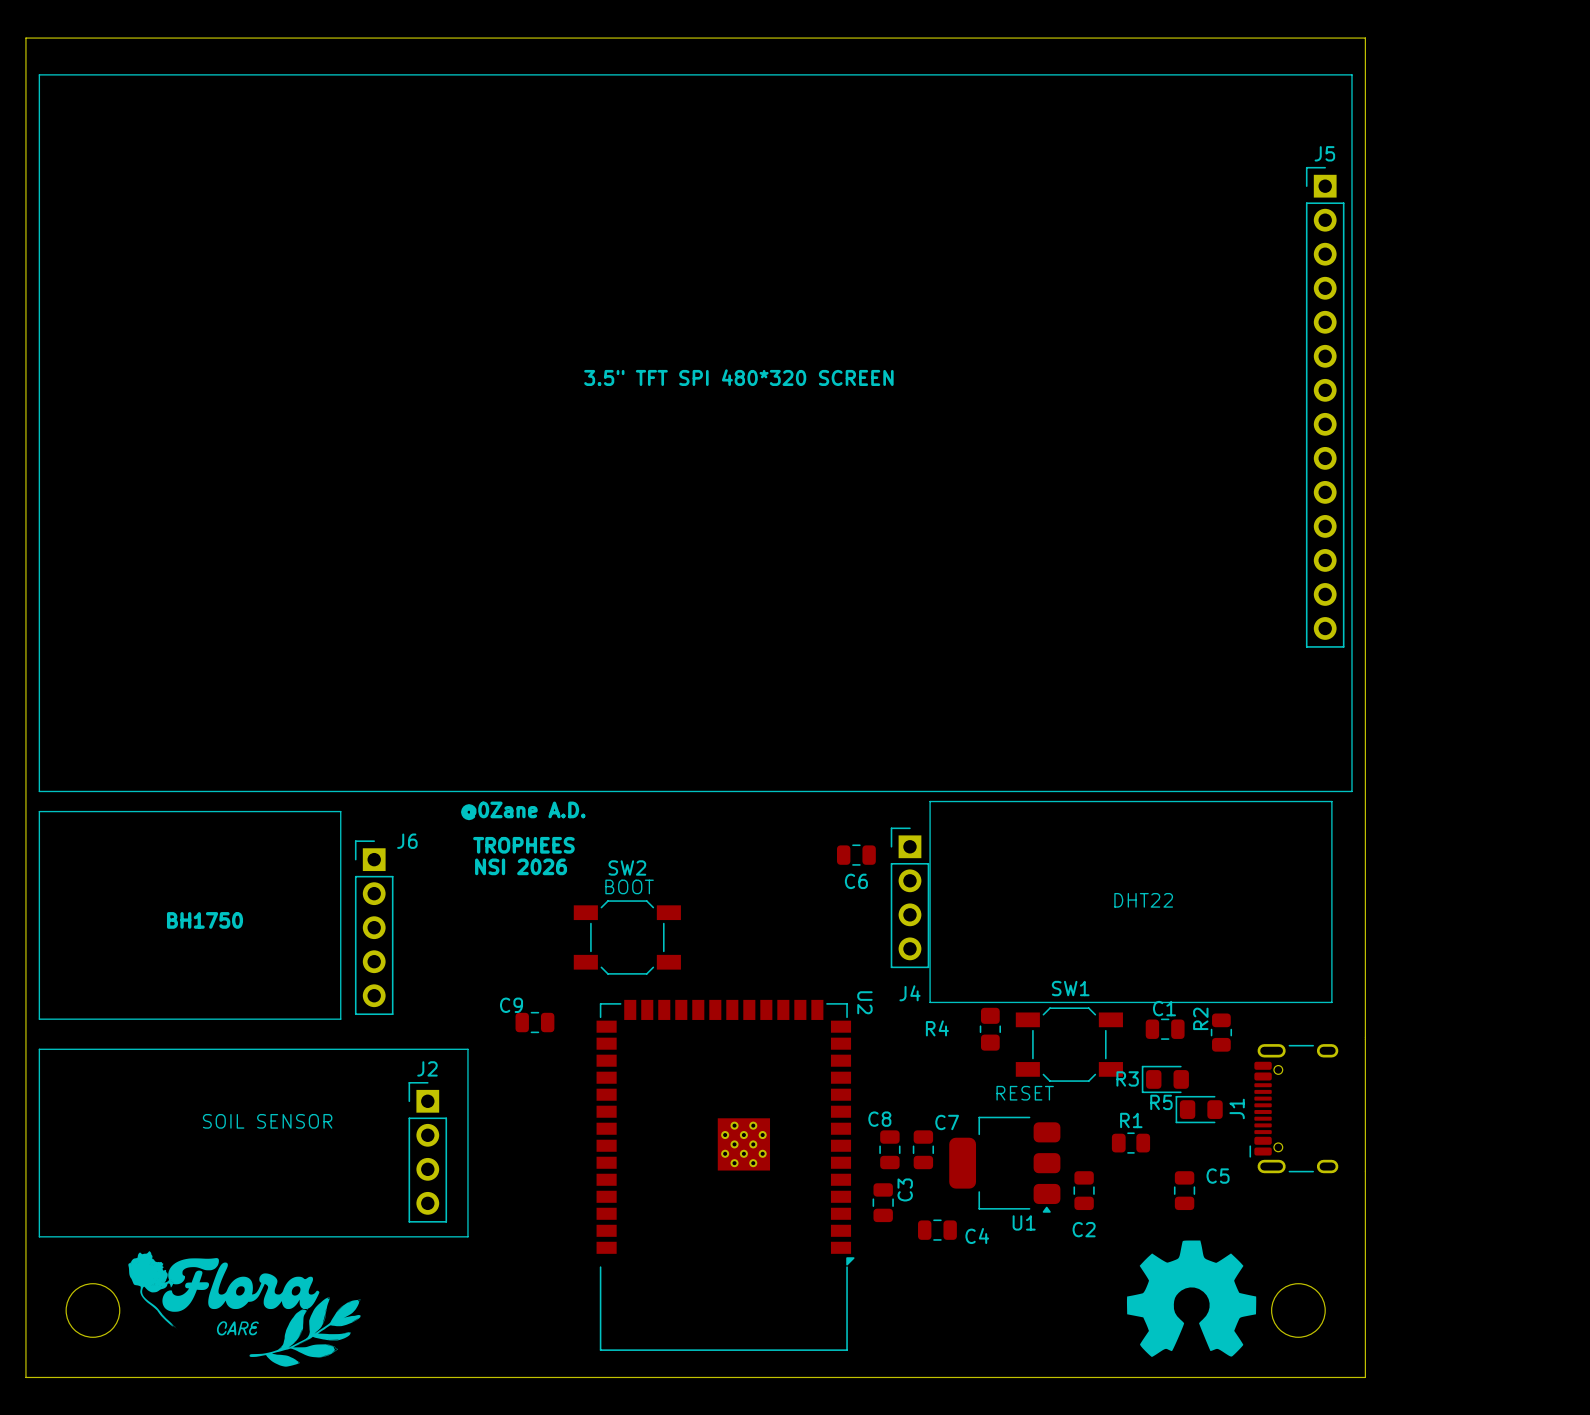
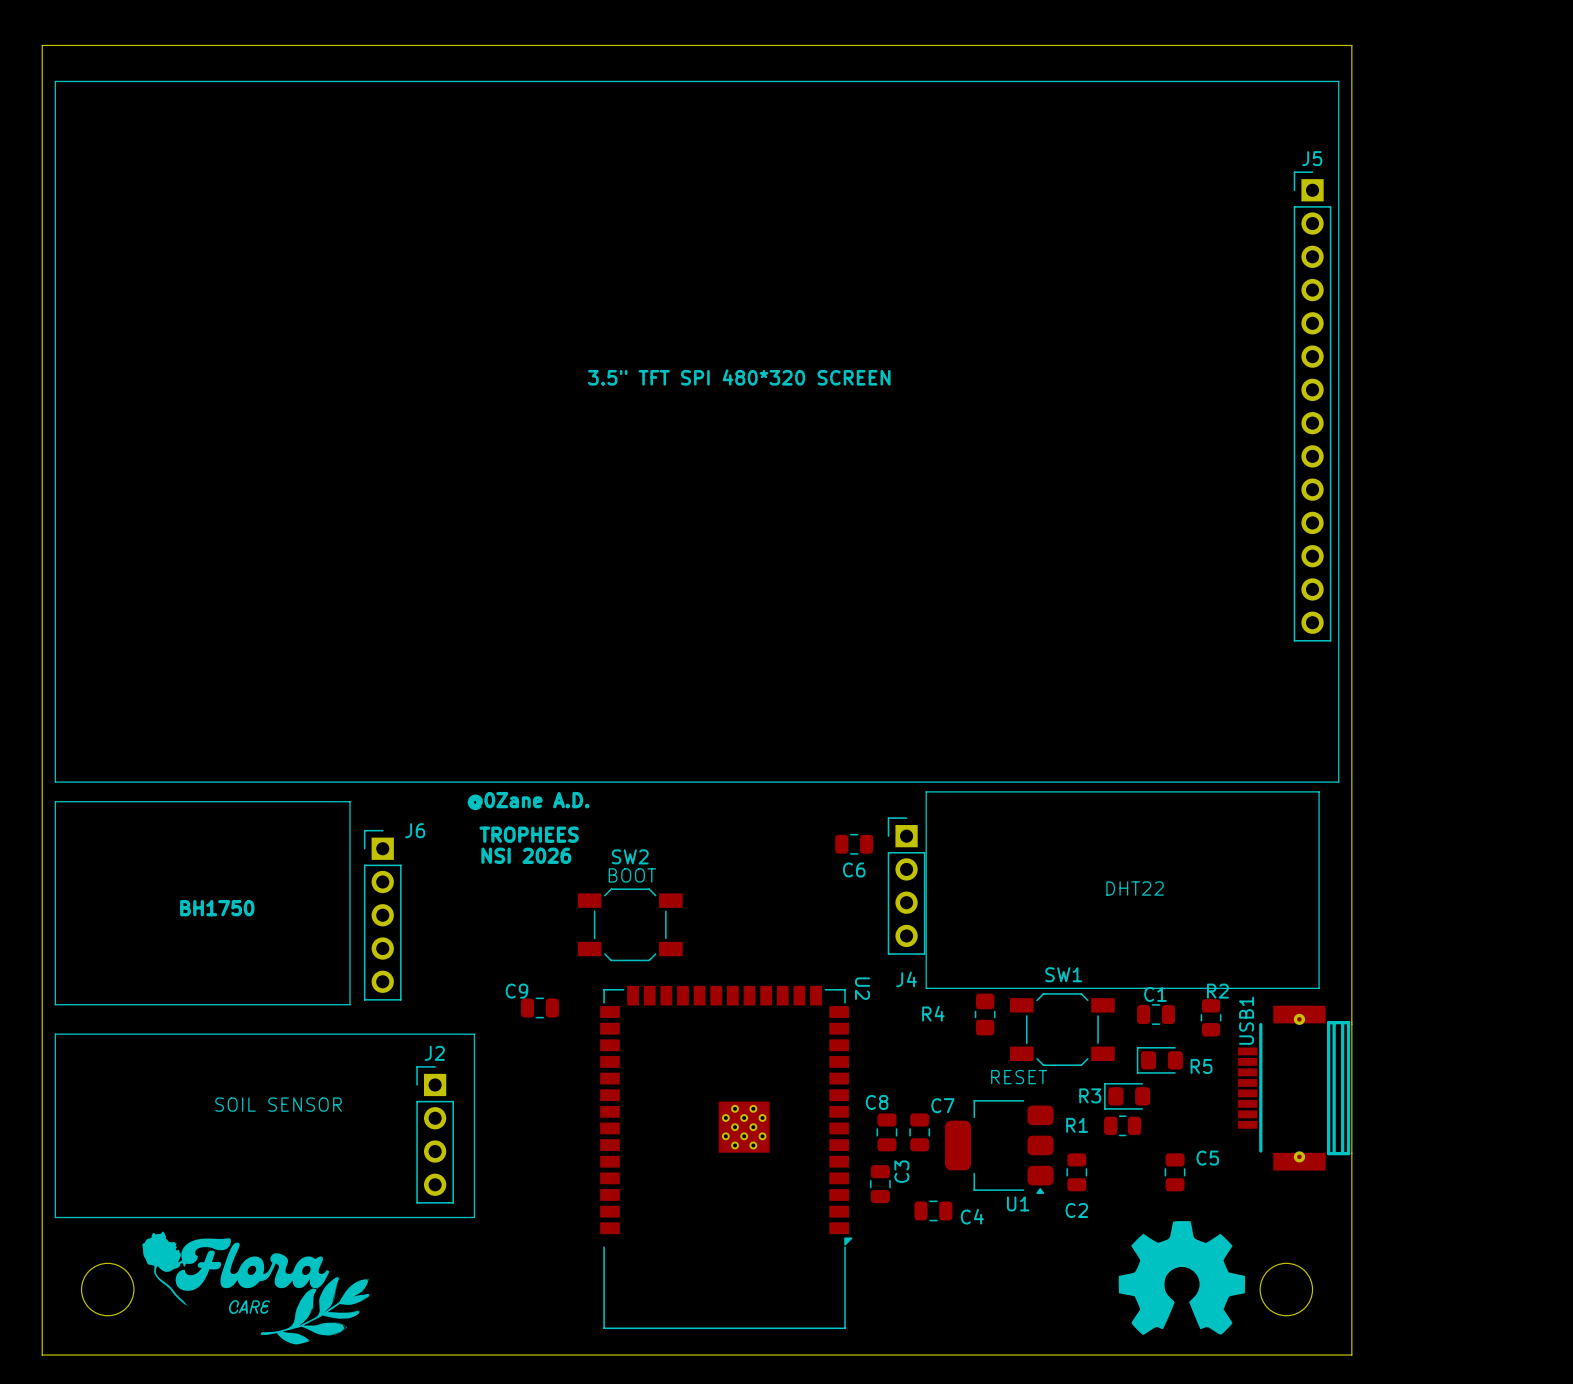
R2 name rotation: 0° (1200, 1018) -> 90° clockwise (1217, 991)
R3 position: (1165, 1079) -> (1127, 1096)
R5 name position: R5 (1161, 1102) -> R5 (1201, 1066)
USB1: none -> (1294, 1088)
J1: (1293, 1108) -> none
R5 position: (1199, 1109) -> (1159, 1060)
R1 name position: R1 (1131, 1120) -> R1 (1077, 1125)

